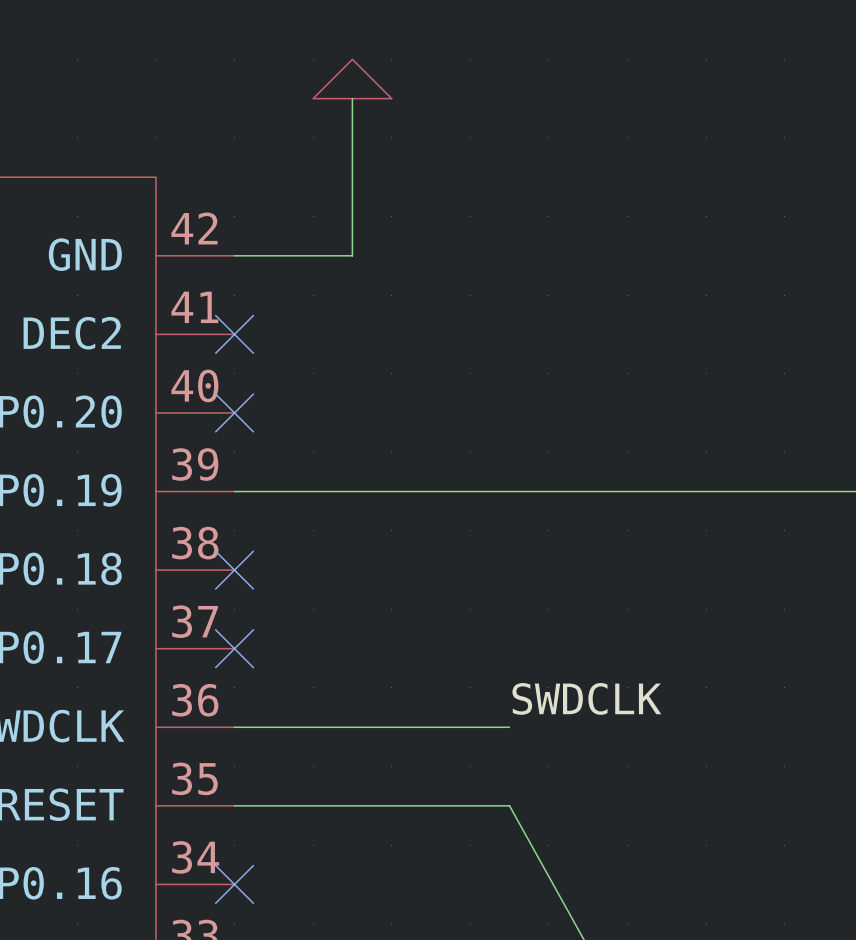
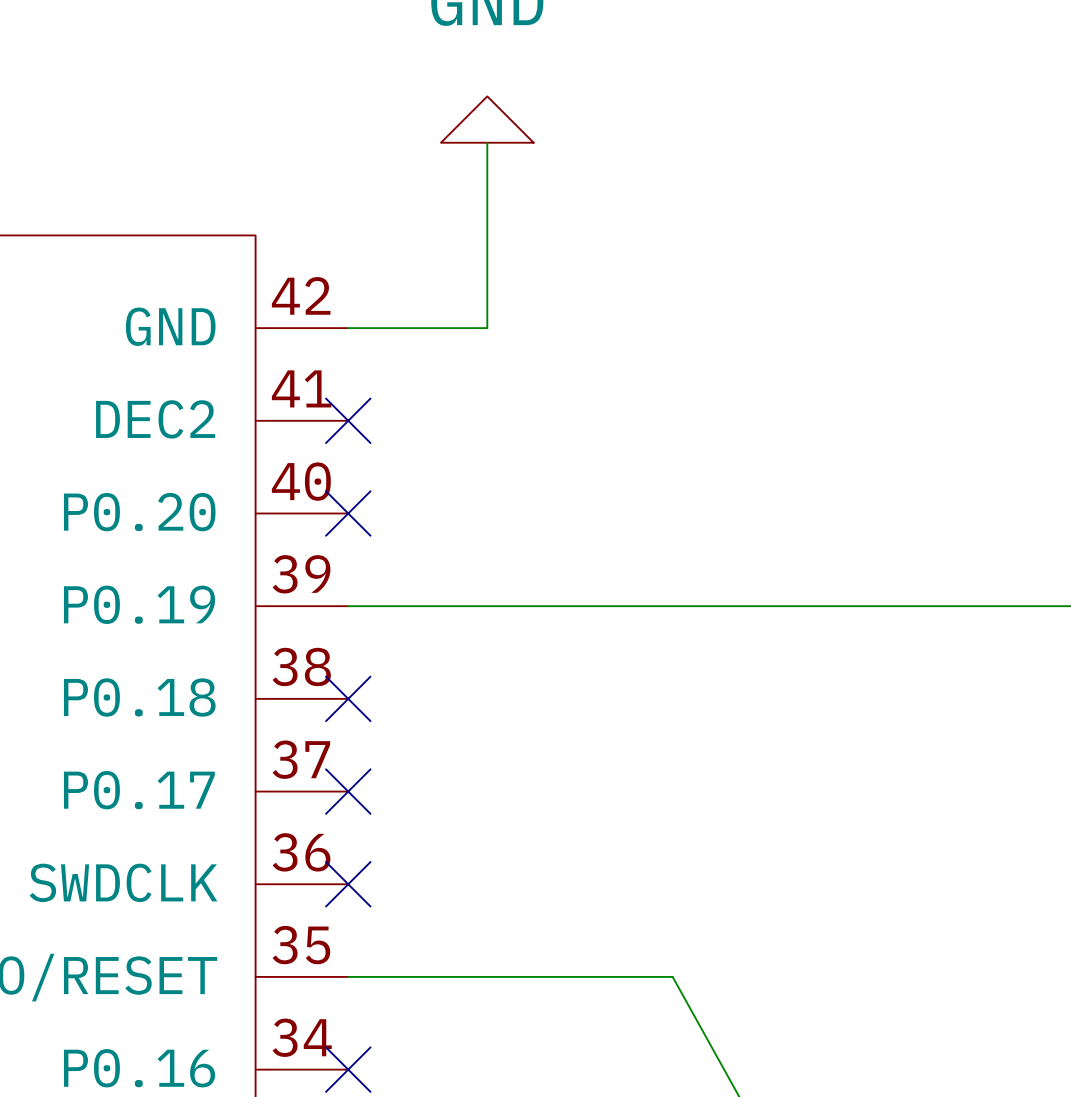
label: SWDCLK (586, 698) -> none
wire: (234, 727) (509, 727) -> none
no-connect mark: none -> (348, 884)

